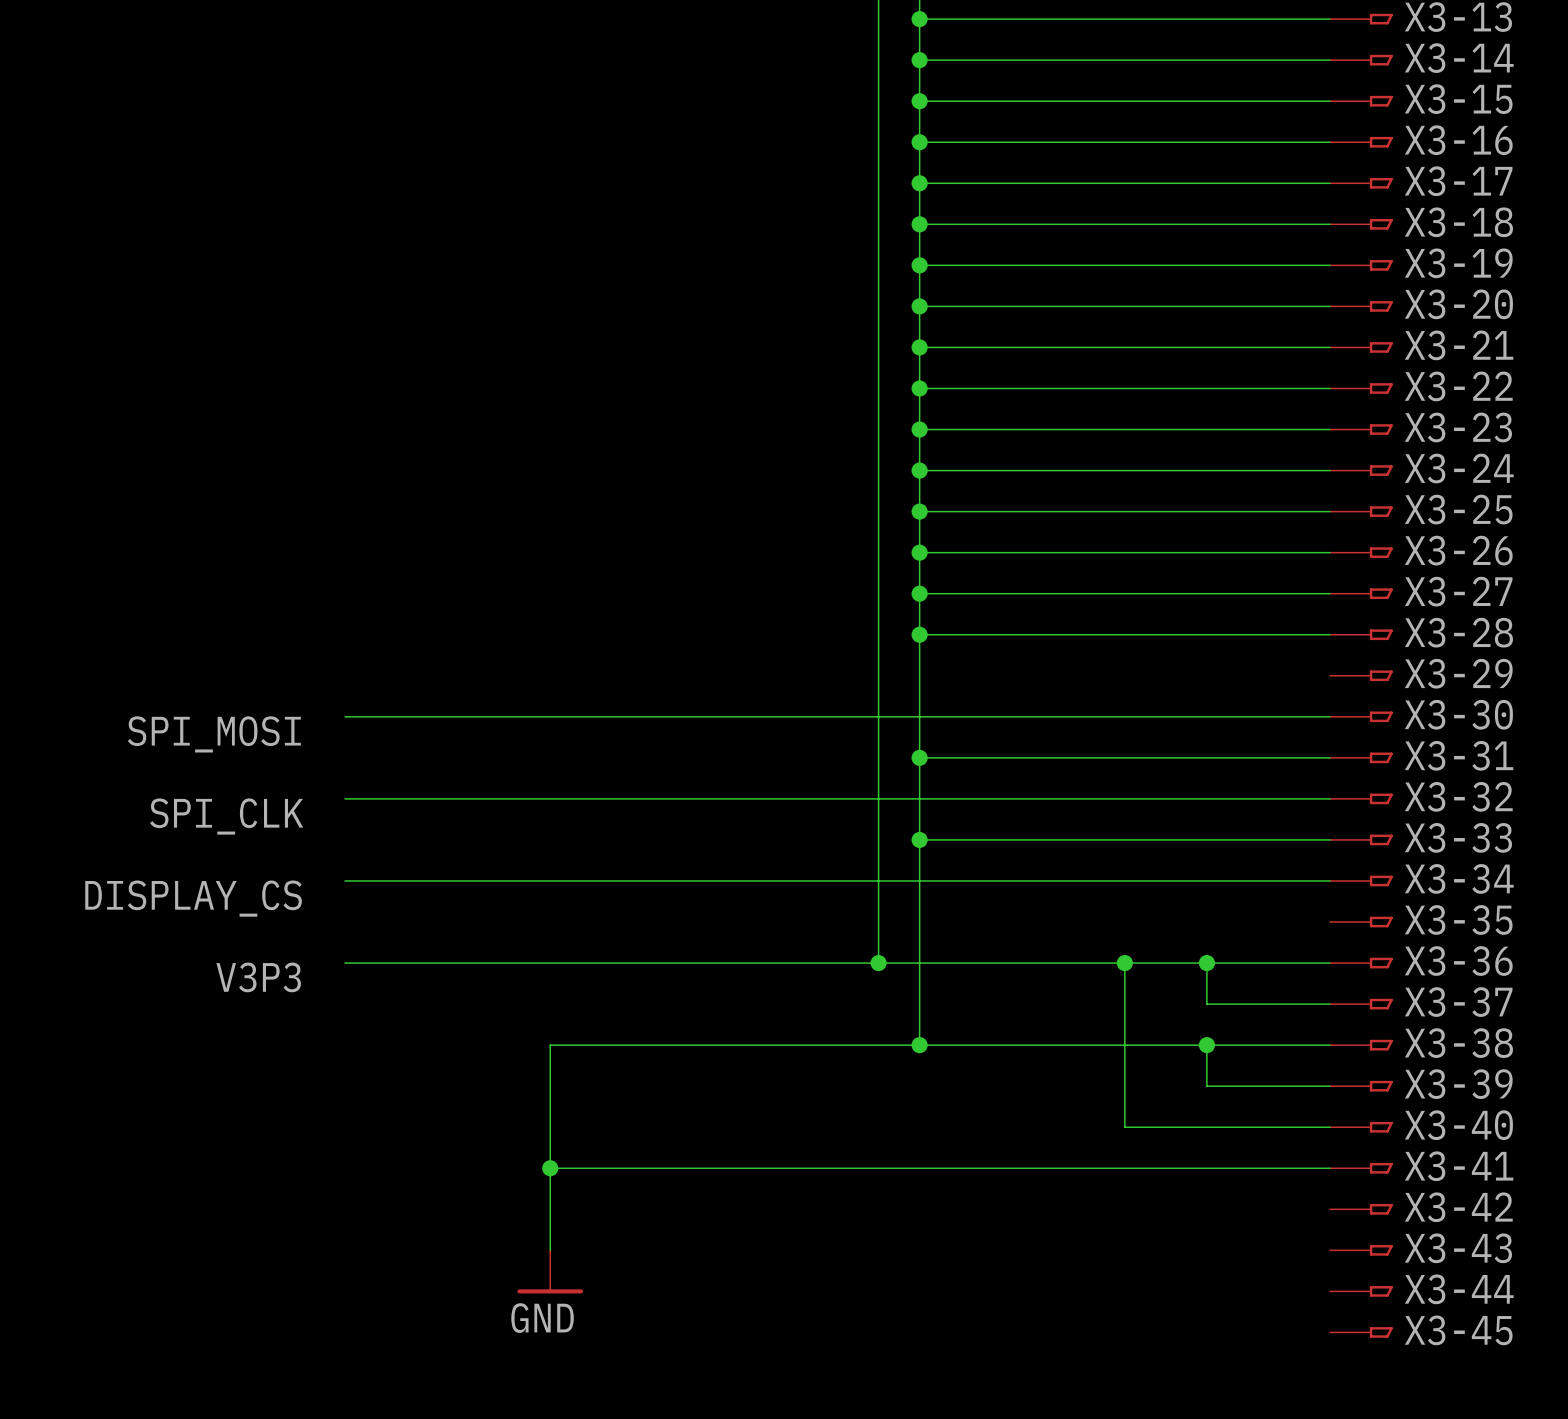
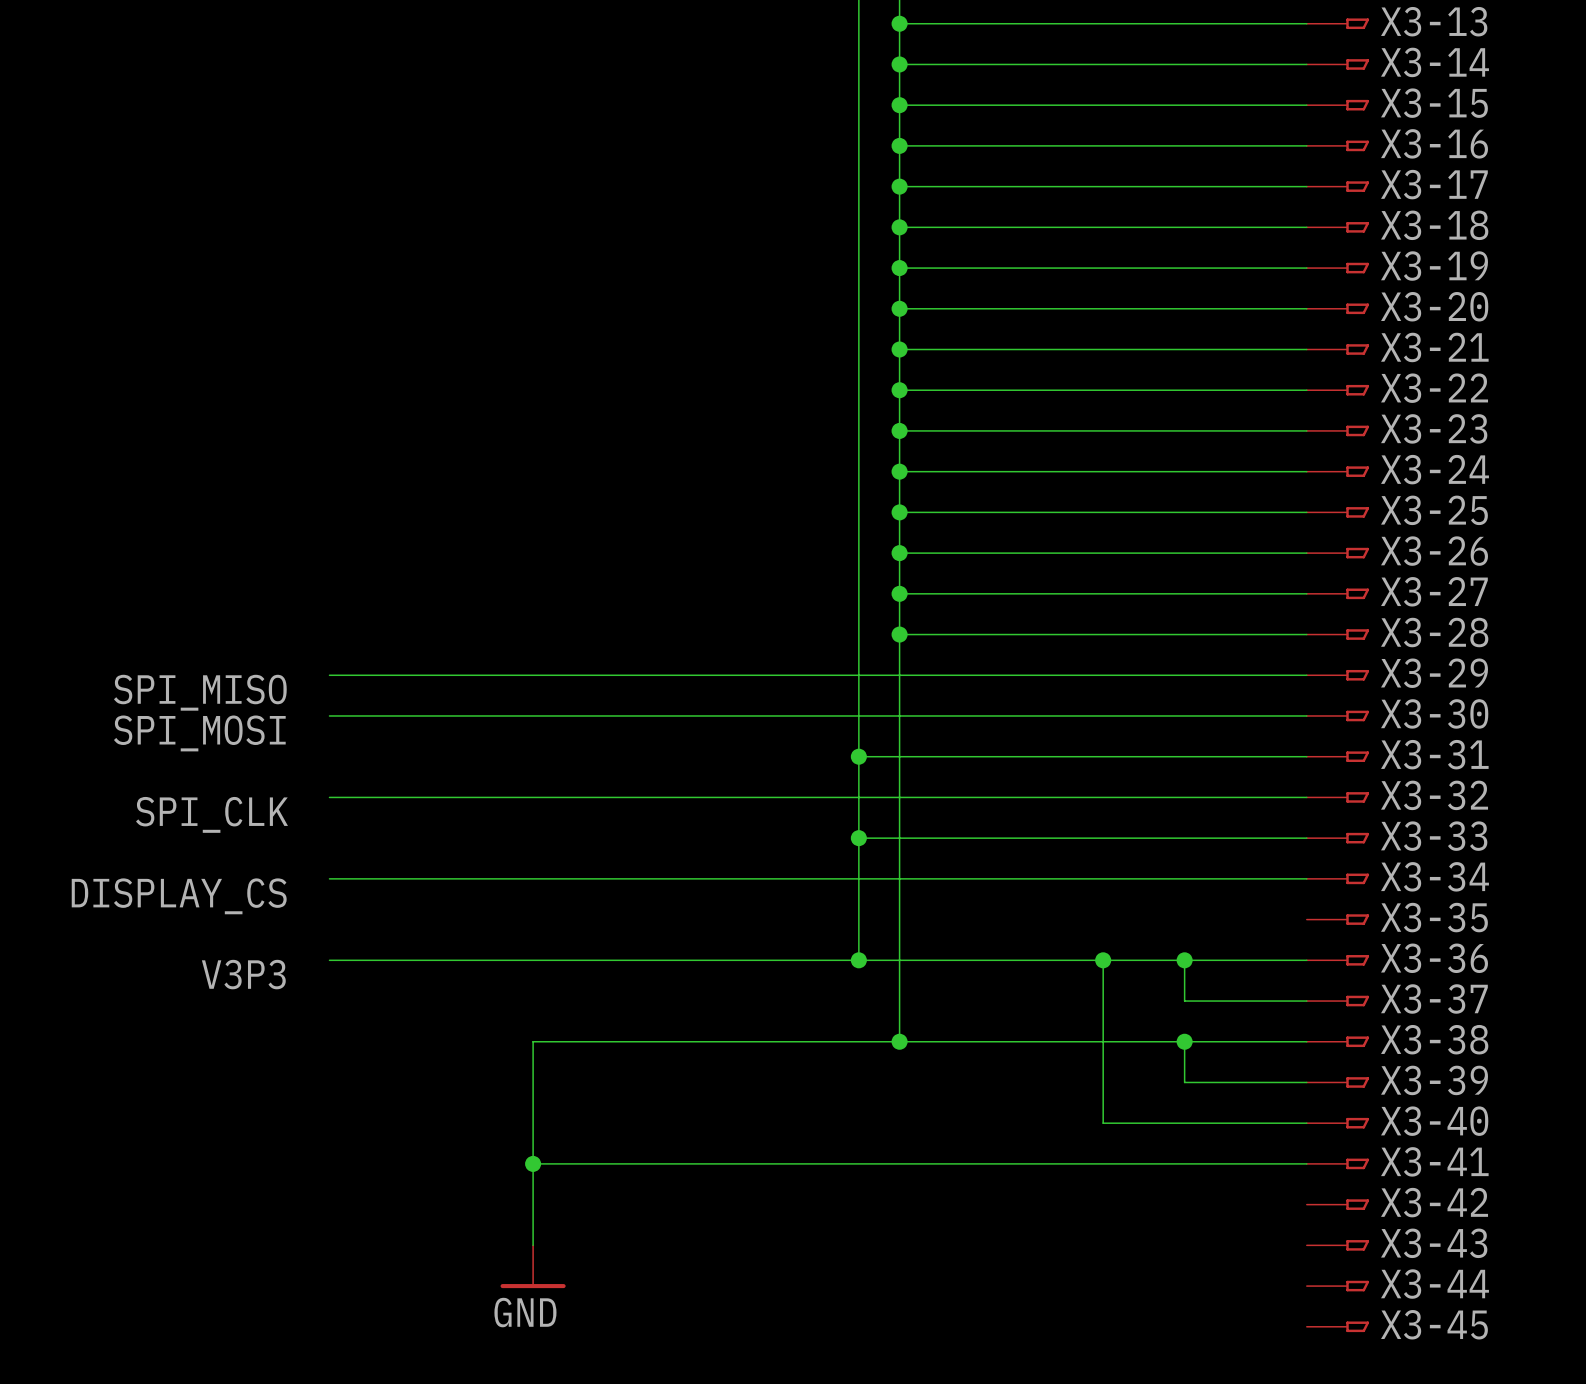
wire: none -> (329, 675) (1306, 675)
label: none -> SPI_MISO (200, 692)
wire: none -> (858, 756) (899, 756)
junction position: (919, 757) -> (858, 756)
wire: none -> (858, 838) (899, 838)
junction position: (919, 839) -> (858, 838)

